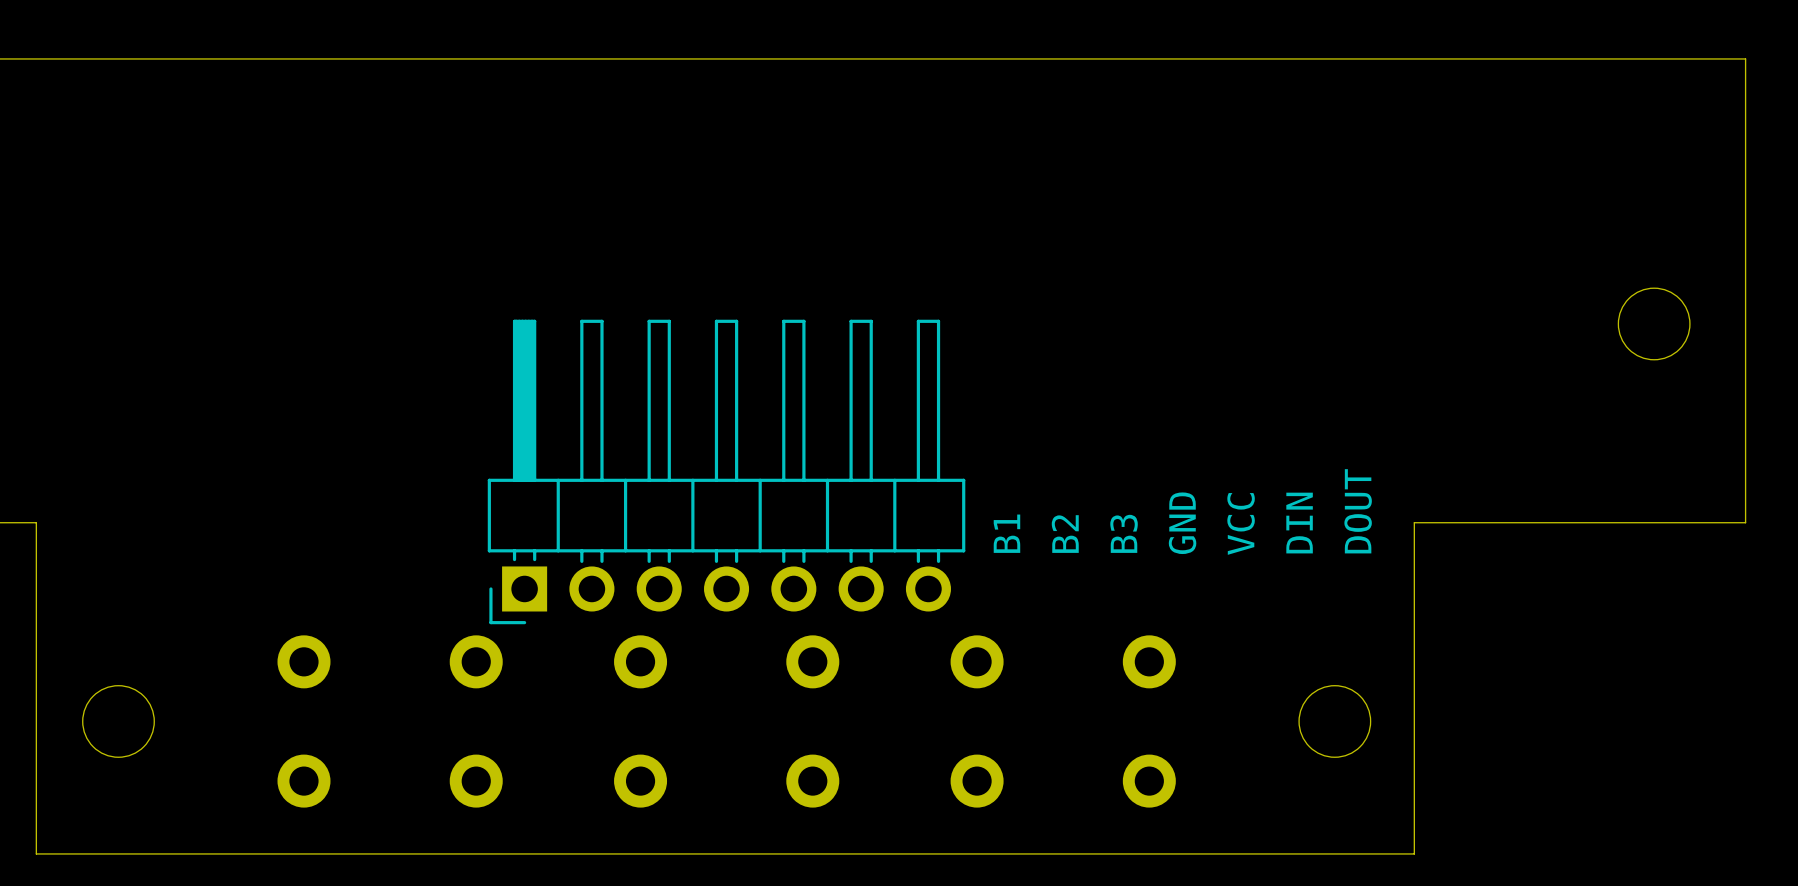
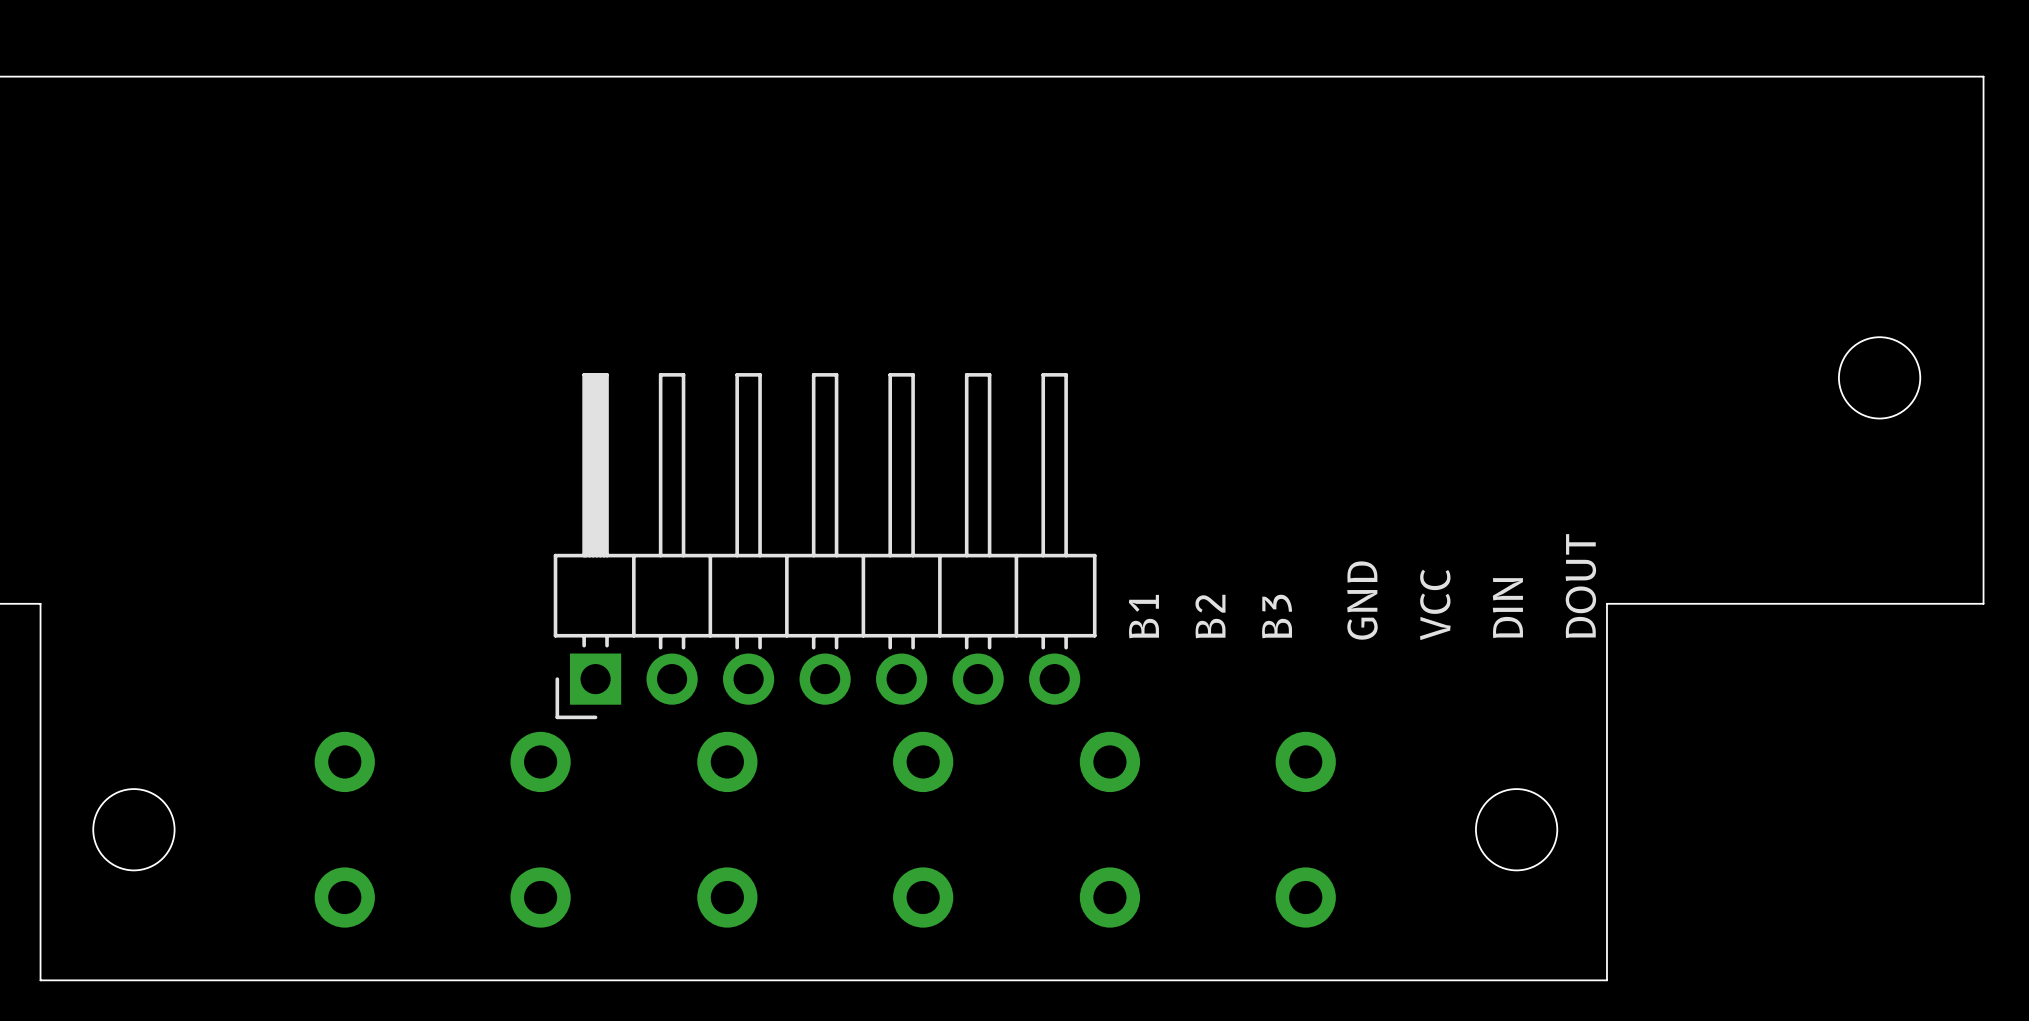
text position: DOUT (1358, 511) -> DOUT (1580, 586)
text position: GND (1182, 523) -> GND (1362, 600)
text position: VCC (1241, 523) -> VCC (1435, 604)
text position: DIN (1299, 523) -> DIN (1507, 608)

